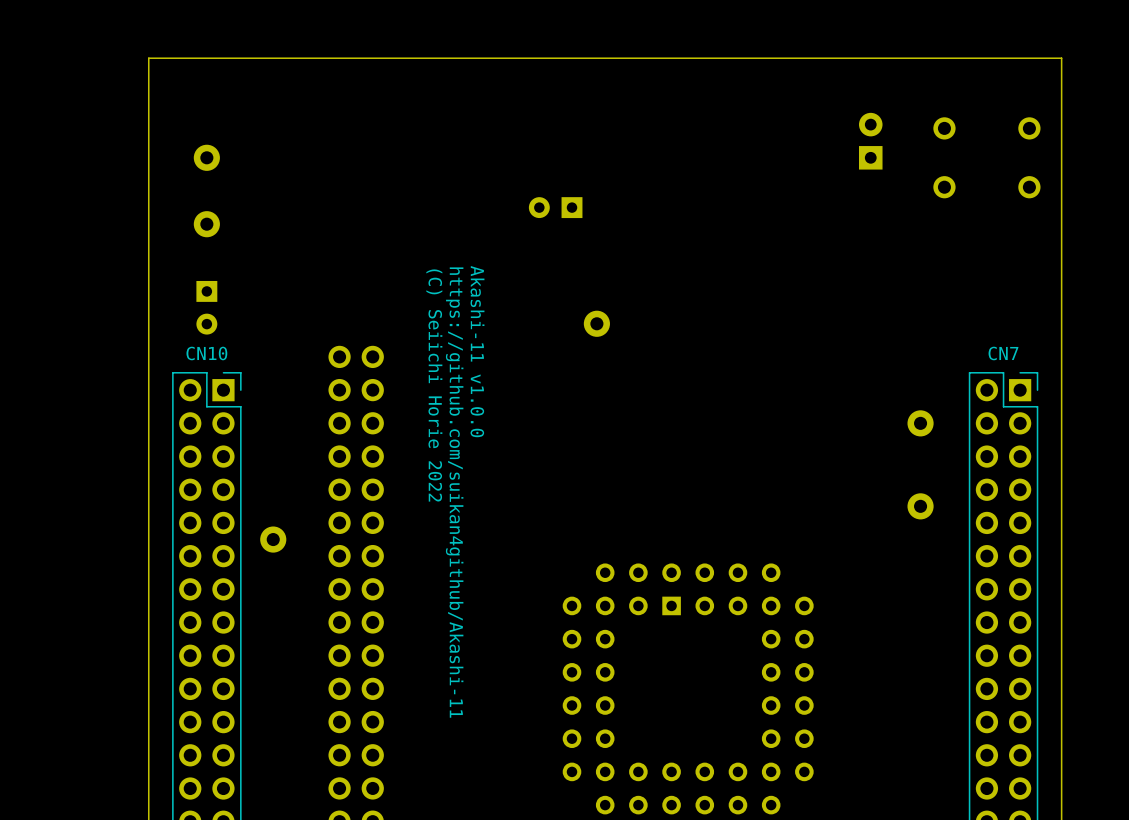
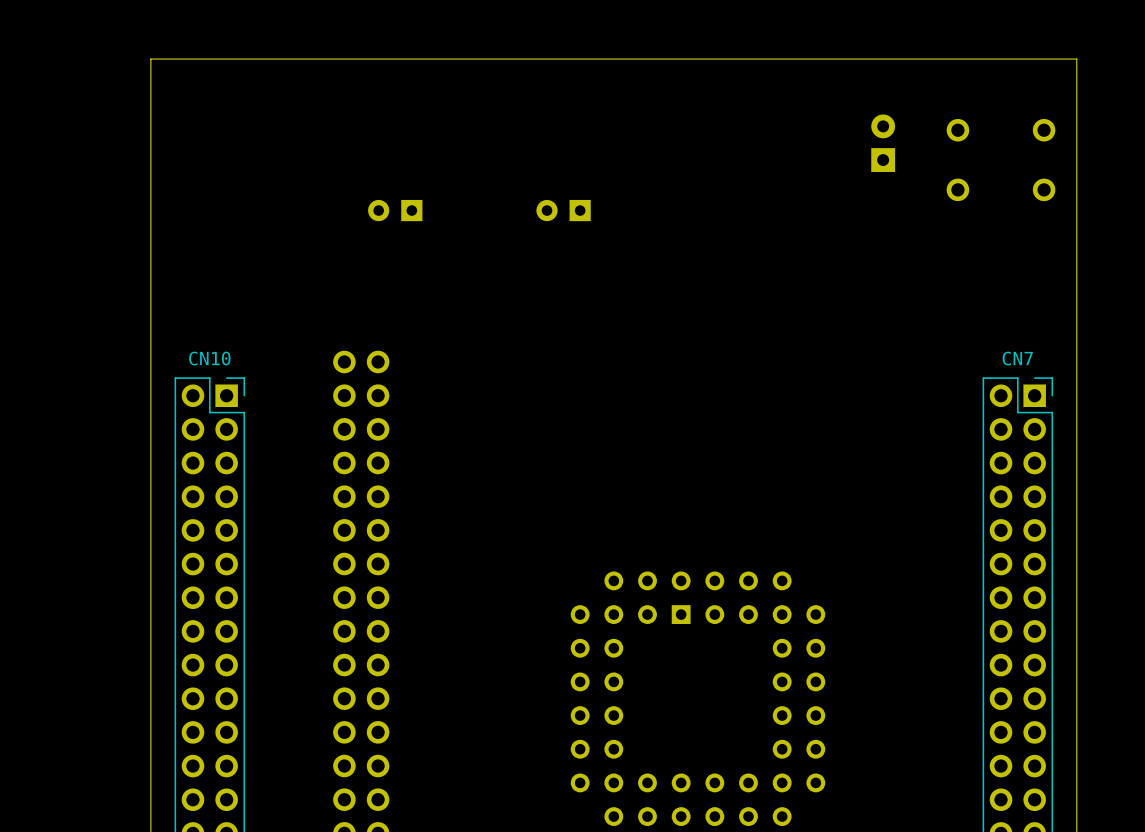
part: (206, 157) -> none
part: (206, 224) -> none
part rotation: 0° (206, 307) -> 90° clockwise (395, 210)
part position: (206, 307) -> (395, 210)
part: (596, 323) -> none
text: Akashi-11 v1.0.0 (477, 351) -> none
text: (C) Seiichi Horie 2022 (434, 385) -> none
part: (920, 423) -> none
text: https://github.com/suikan4github/Akashi-11 (454, 492) -> none
part: (920, 506) -> none
part: (273, 539) -> none

